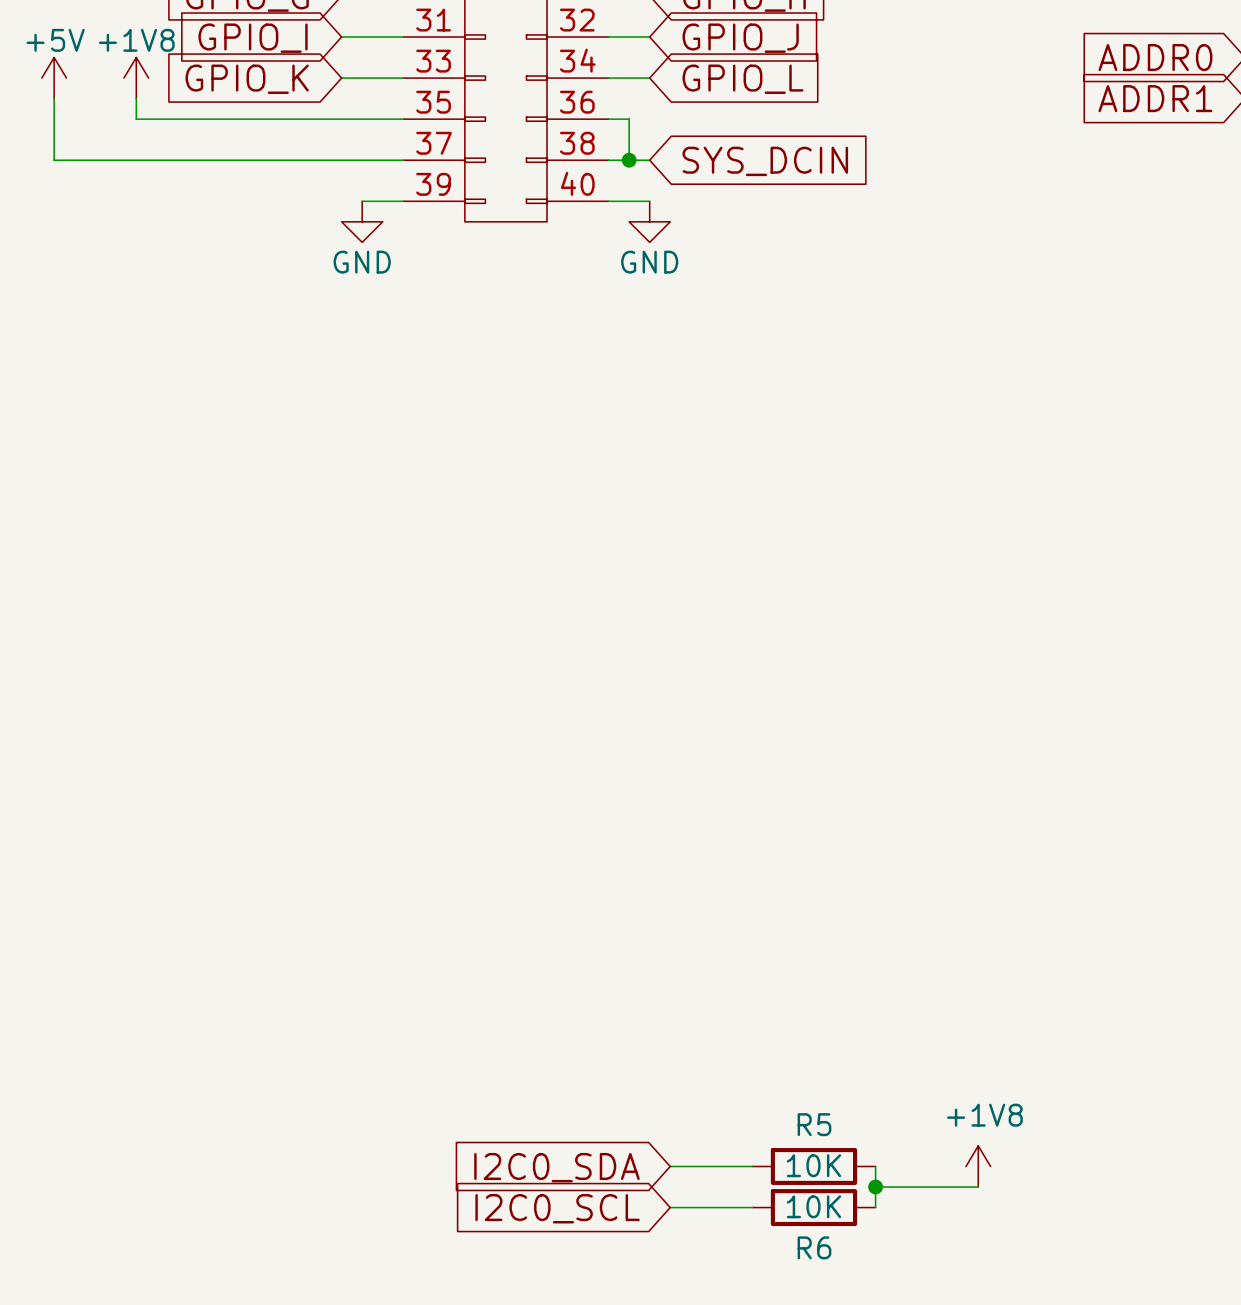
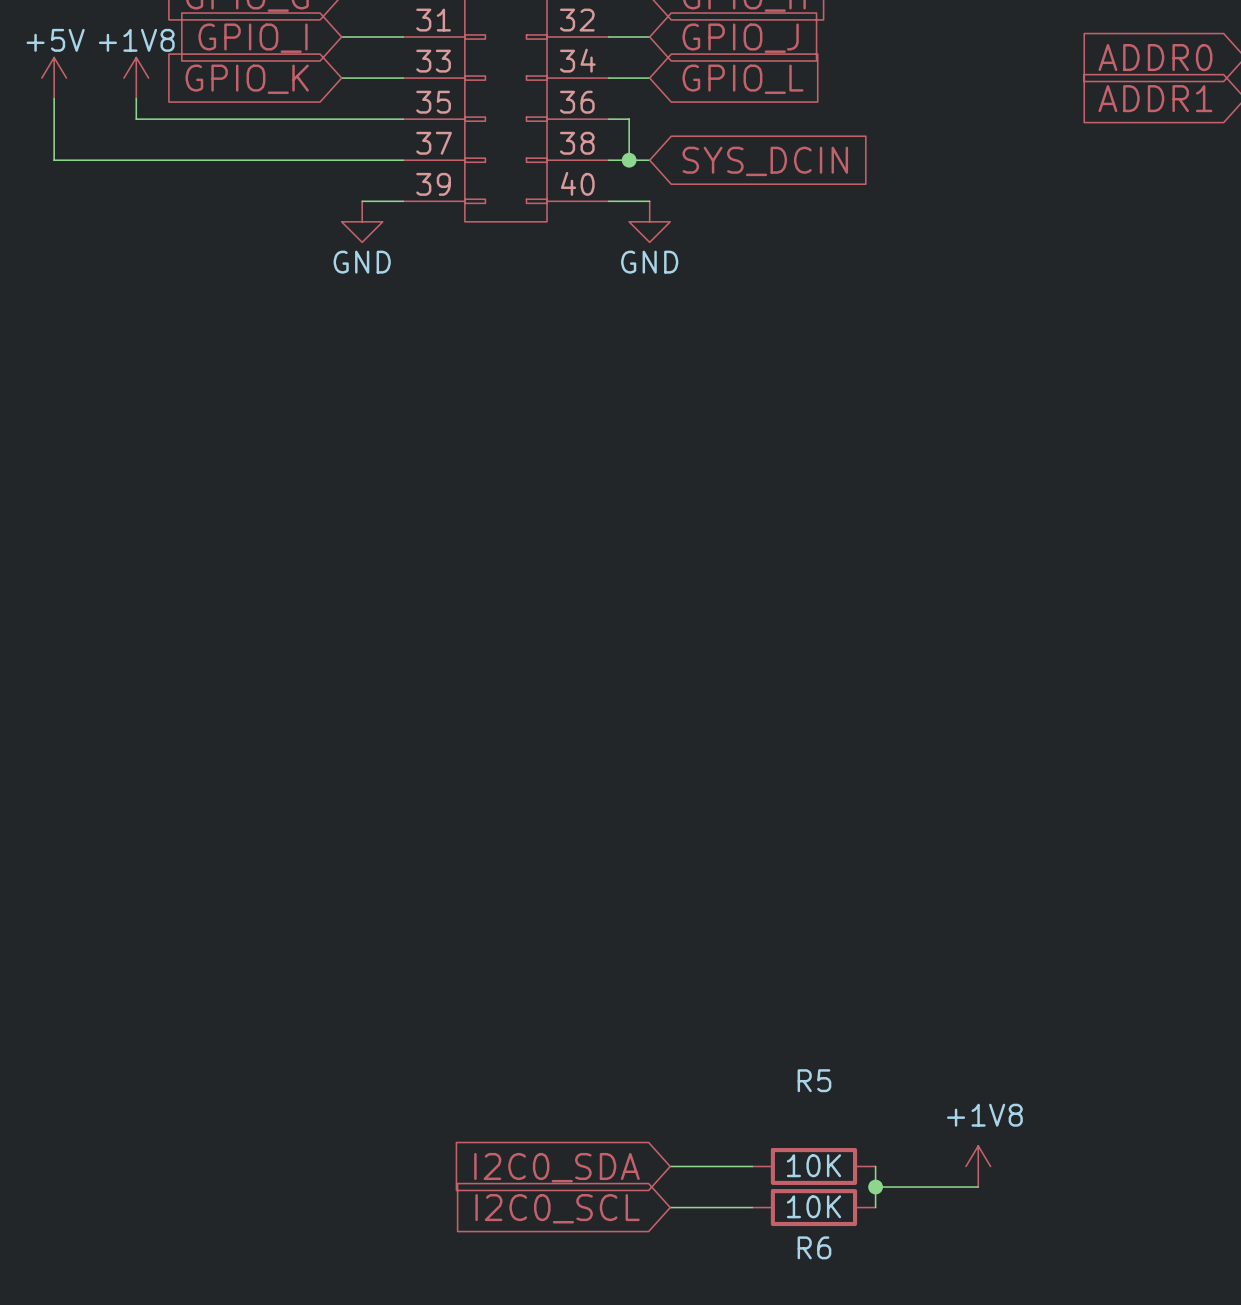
R5 name position: R5 (814, 1124) -> R5 (814, 1080)

